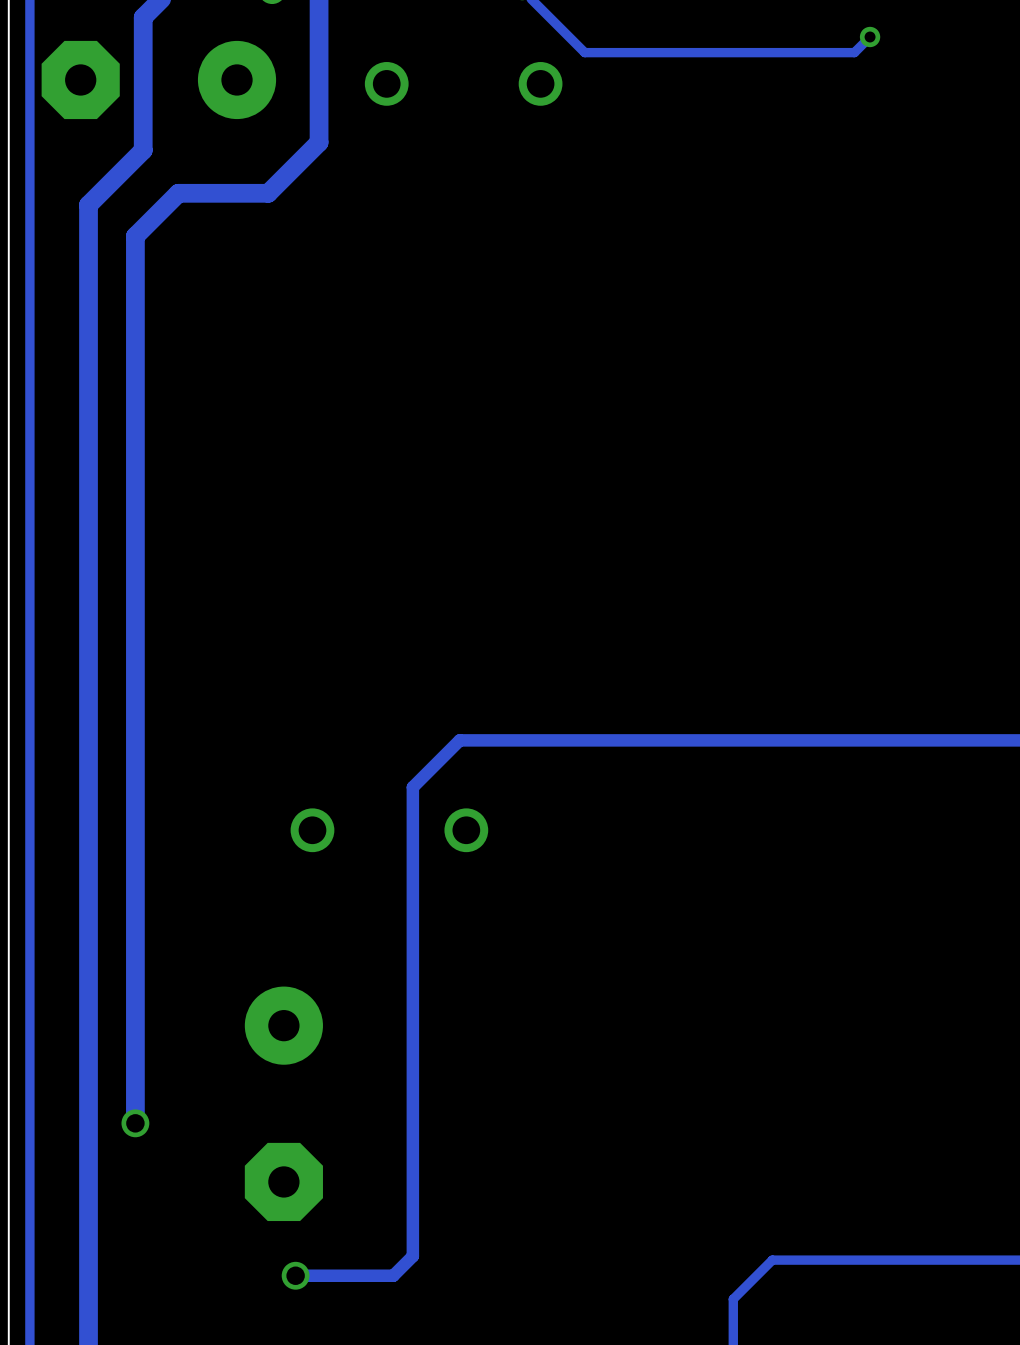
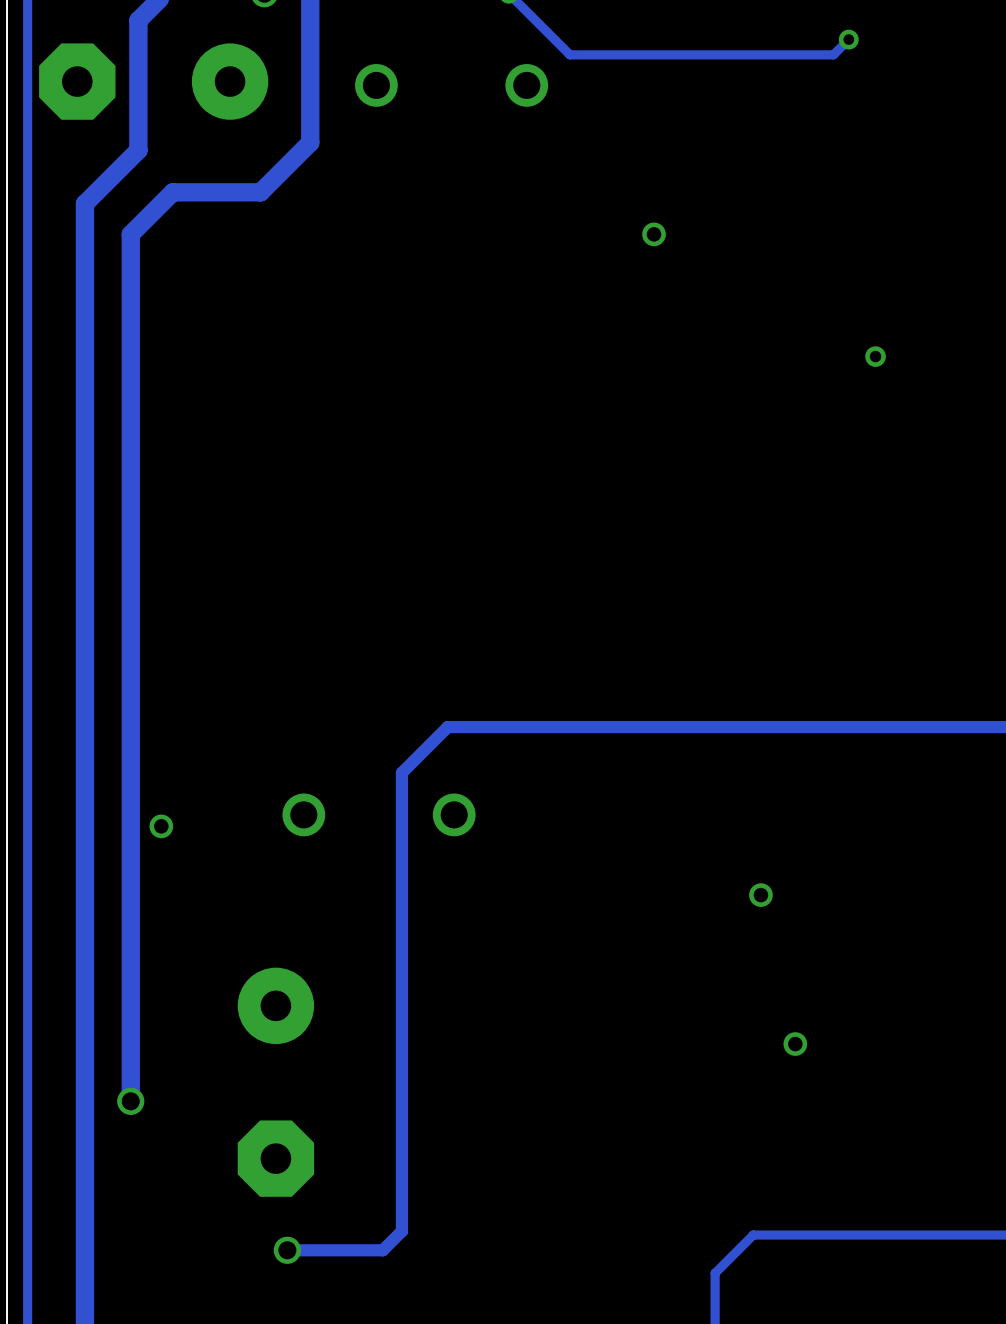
via: none -> (654, 234)
via: none -> (875, 356)
via: none -> (161, 826)
via: none -> (760, 895)
via: none -> (795, 1044)

